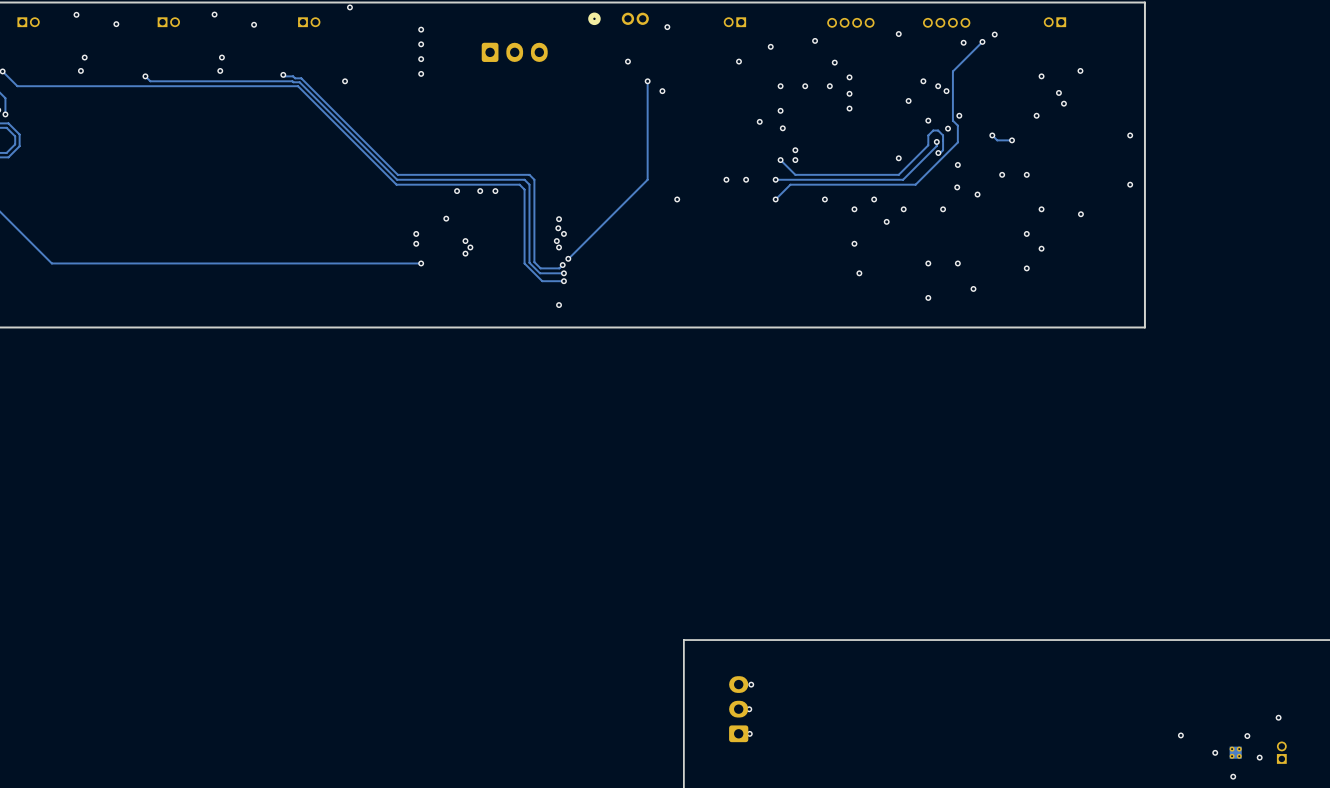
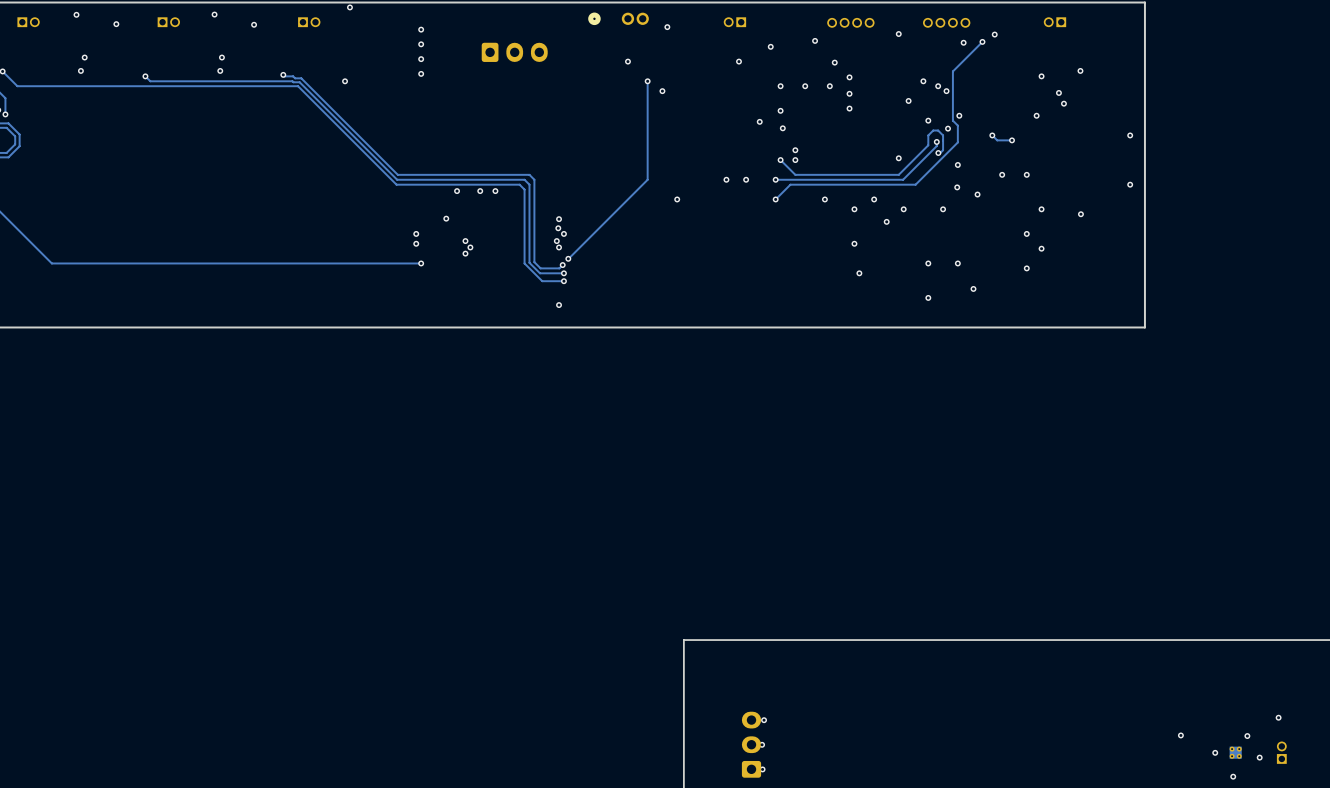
via: (751, 684) -> none
part position: (738, 709) -> (751, 744)
via: (749, 709) -> none
via: none -> (764, 720)
via: (749, 733) -> none
via: none -> (762, 744)
via: none -> (762, 769)

